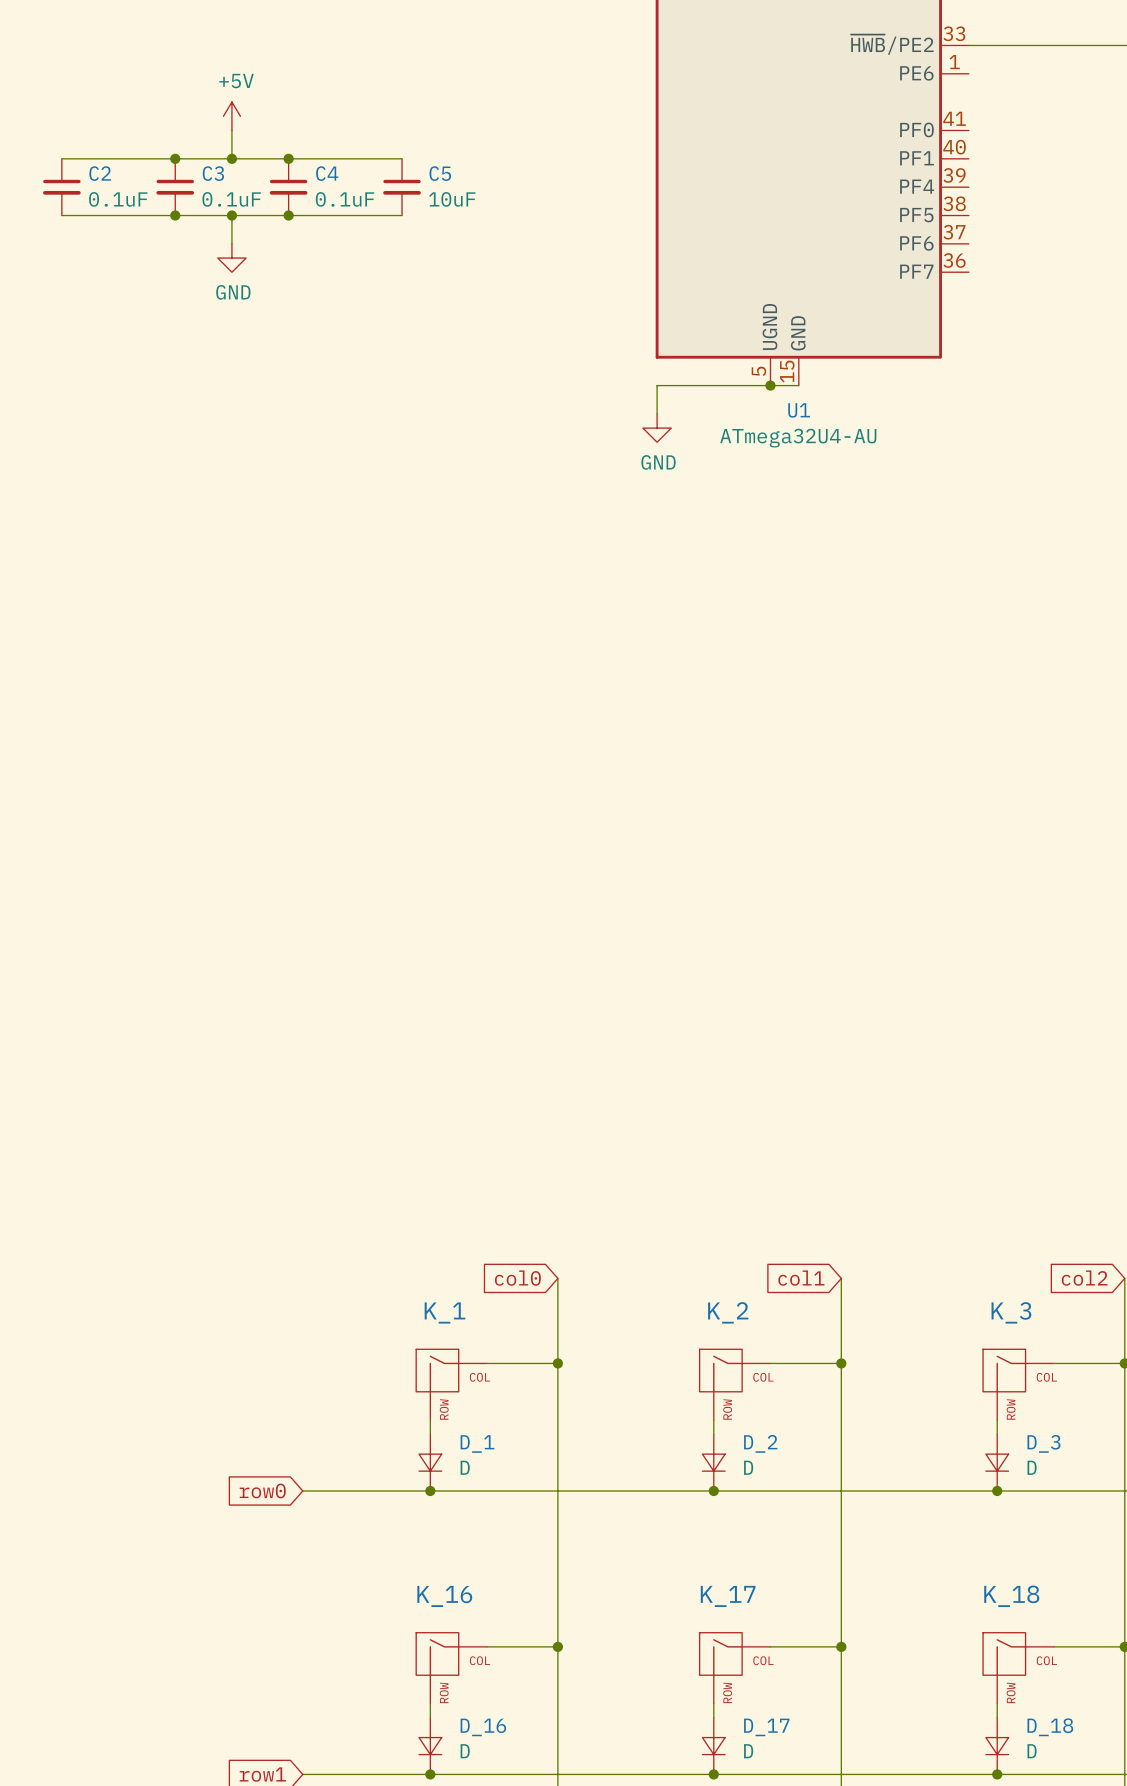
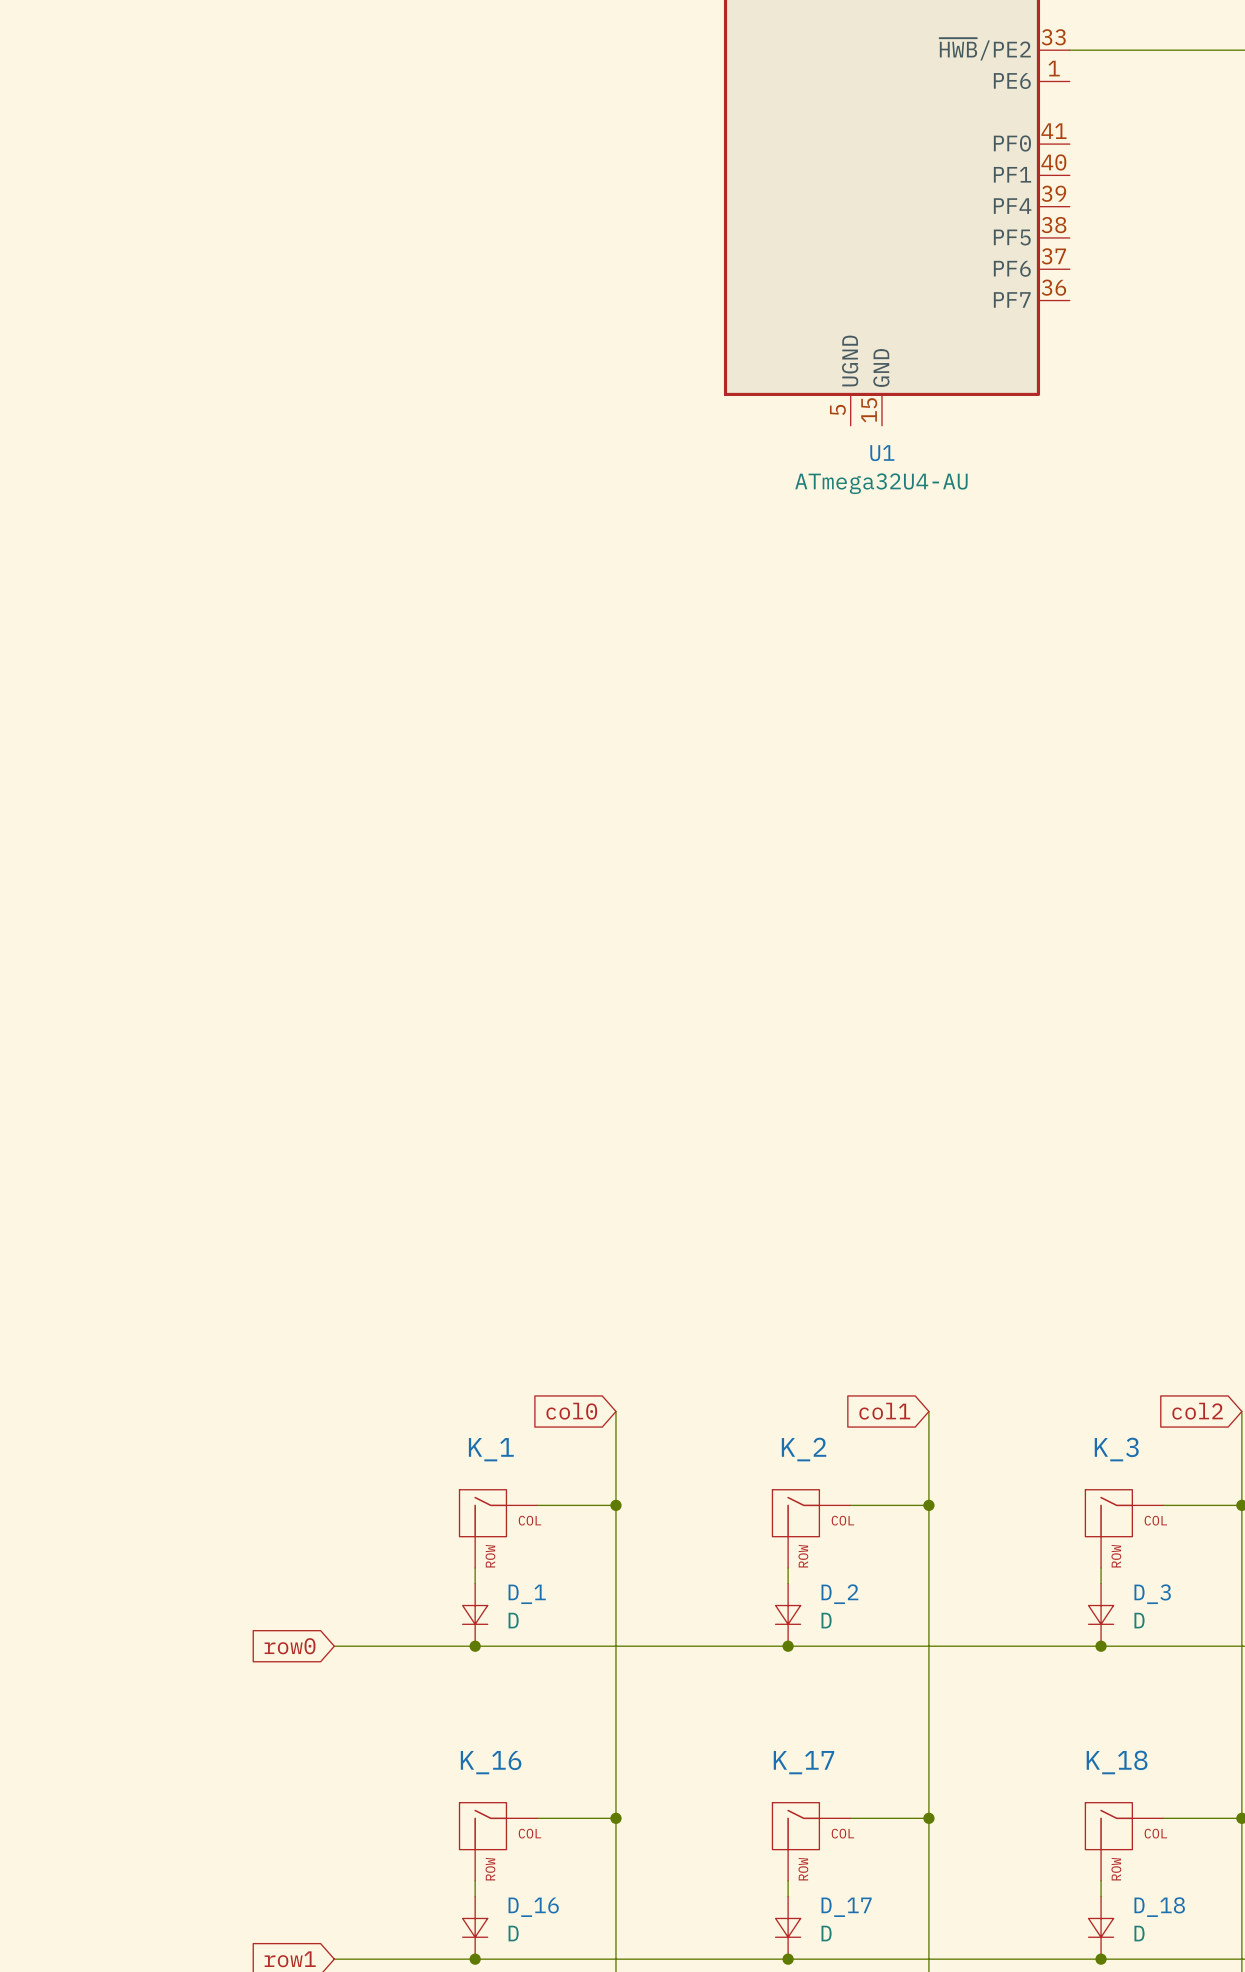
power symbol: +5V (231, 116) -> none
wire: (231, 130) (231, 158) -> none
wire: (61, 158) (402, 158) -> none
junction: (175, 158) -> none
junction: (231, 158) -> none
junction: (288, 158) -> none
C2: 0.1uF (61, 187) -> none
C3: 0.1uF (175, 187) -> none
C4: 0.1uF (288, 187) -> none
C5: 10uF (402, 187) -> none
wire: (61, 215) (402, 215) -> none
junction: (175, 215) -> none
wire: (231, 215) (231, 243) -> none
junction: (231, 215) -> none
junction: (288, 215) -> none
power symbol: GND (231, 258) -> none
junction: (770, 385) -> none
wire: (798, 385) (657, 385) (657, 413) -> none
power symbol: GND (657, 428) -> none

